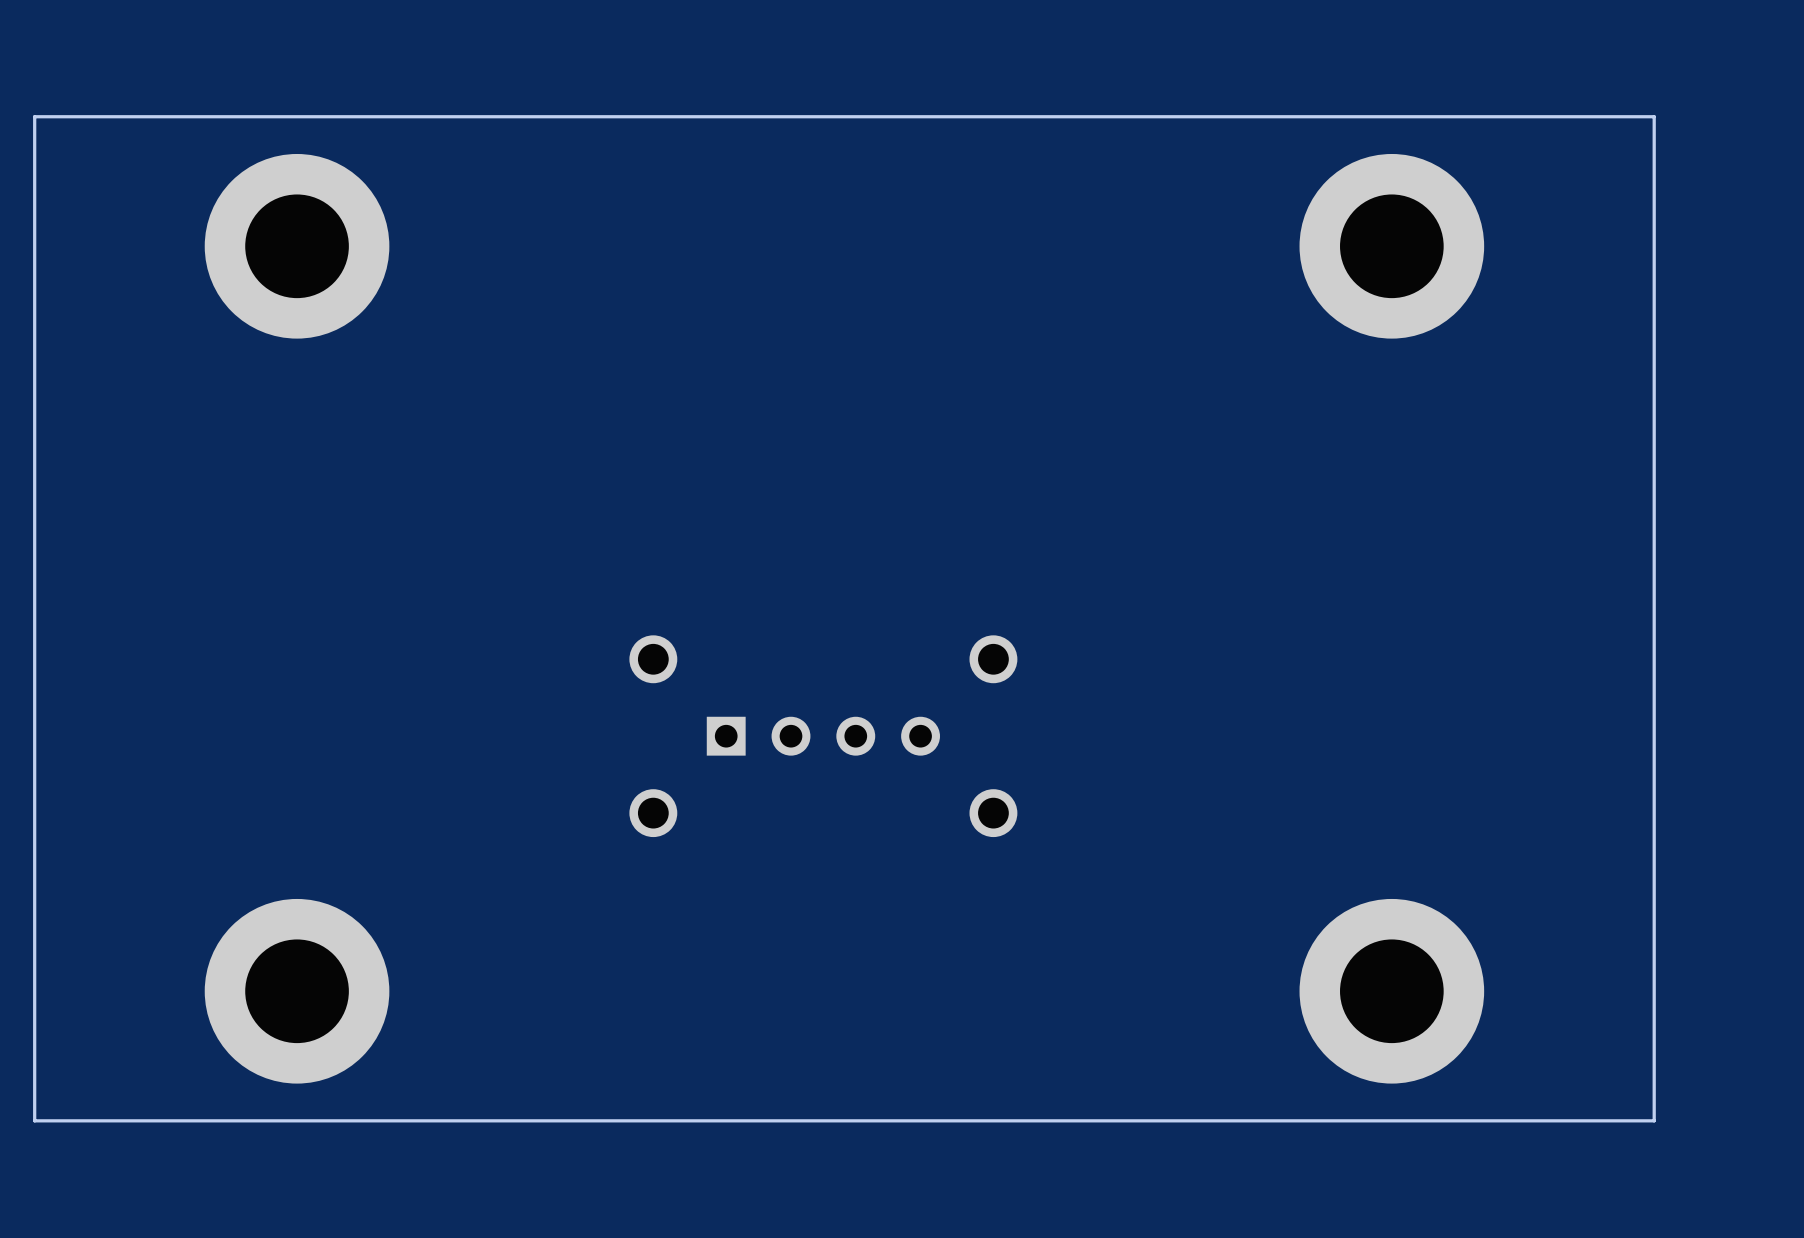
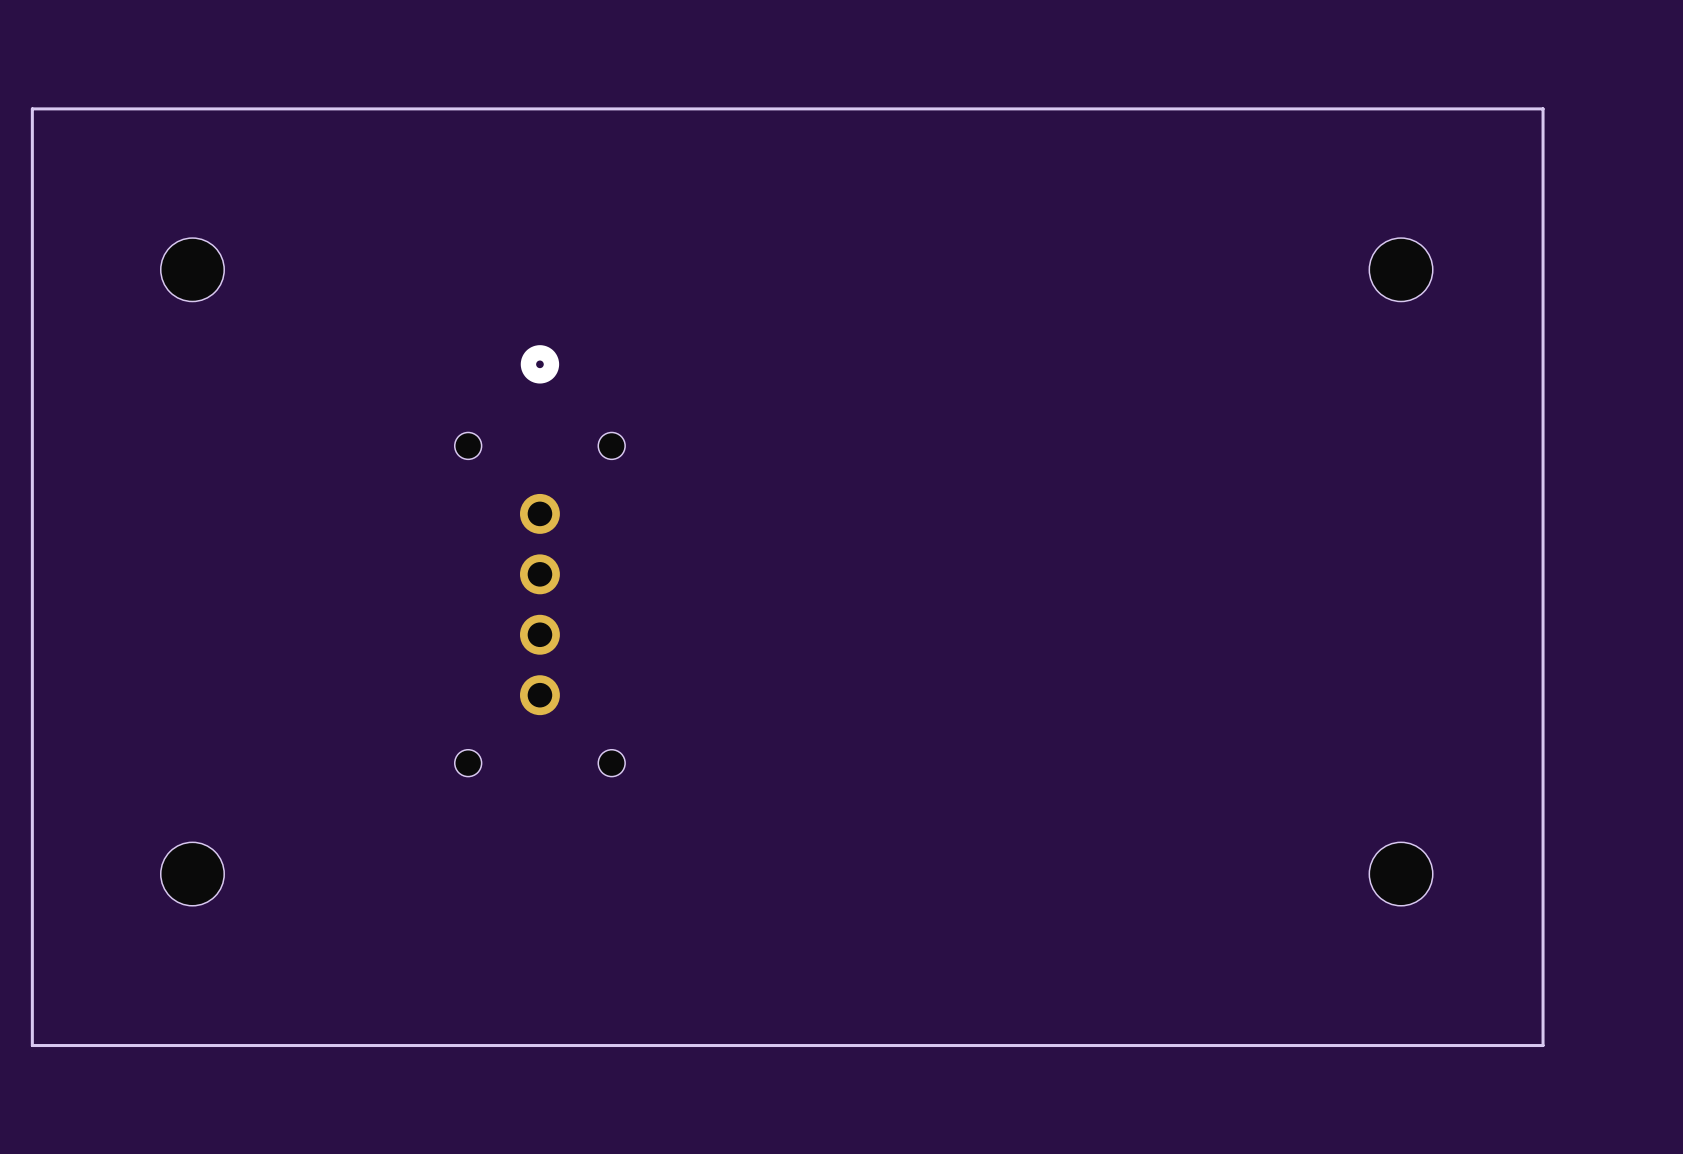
part: (297, 246) -> none
part: (1391, 246) -> none
part: none -> (192, 269)
part: none -> (1401, 269)
part: none -> (539, 560)
part: (823, 736) -> none
part: none -> (192, 874)
part: none -> (1401, 874)
part: (297, 991) -> none
part: (1391, 991) -> none

